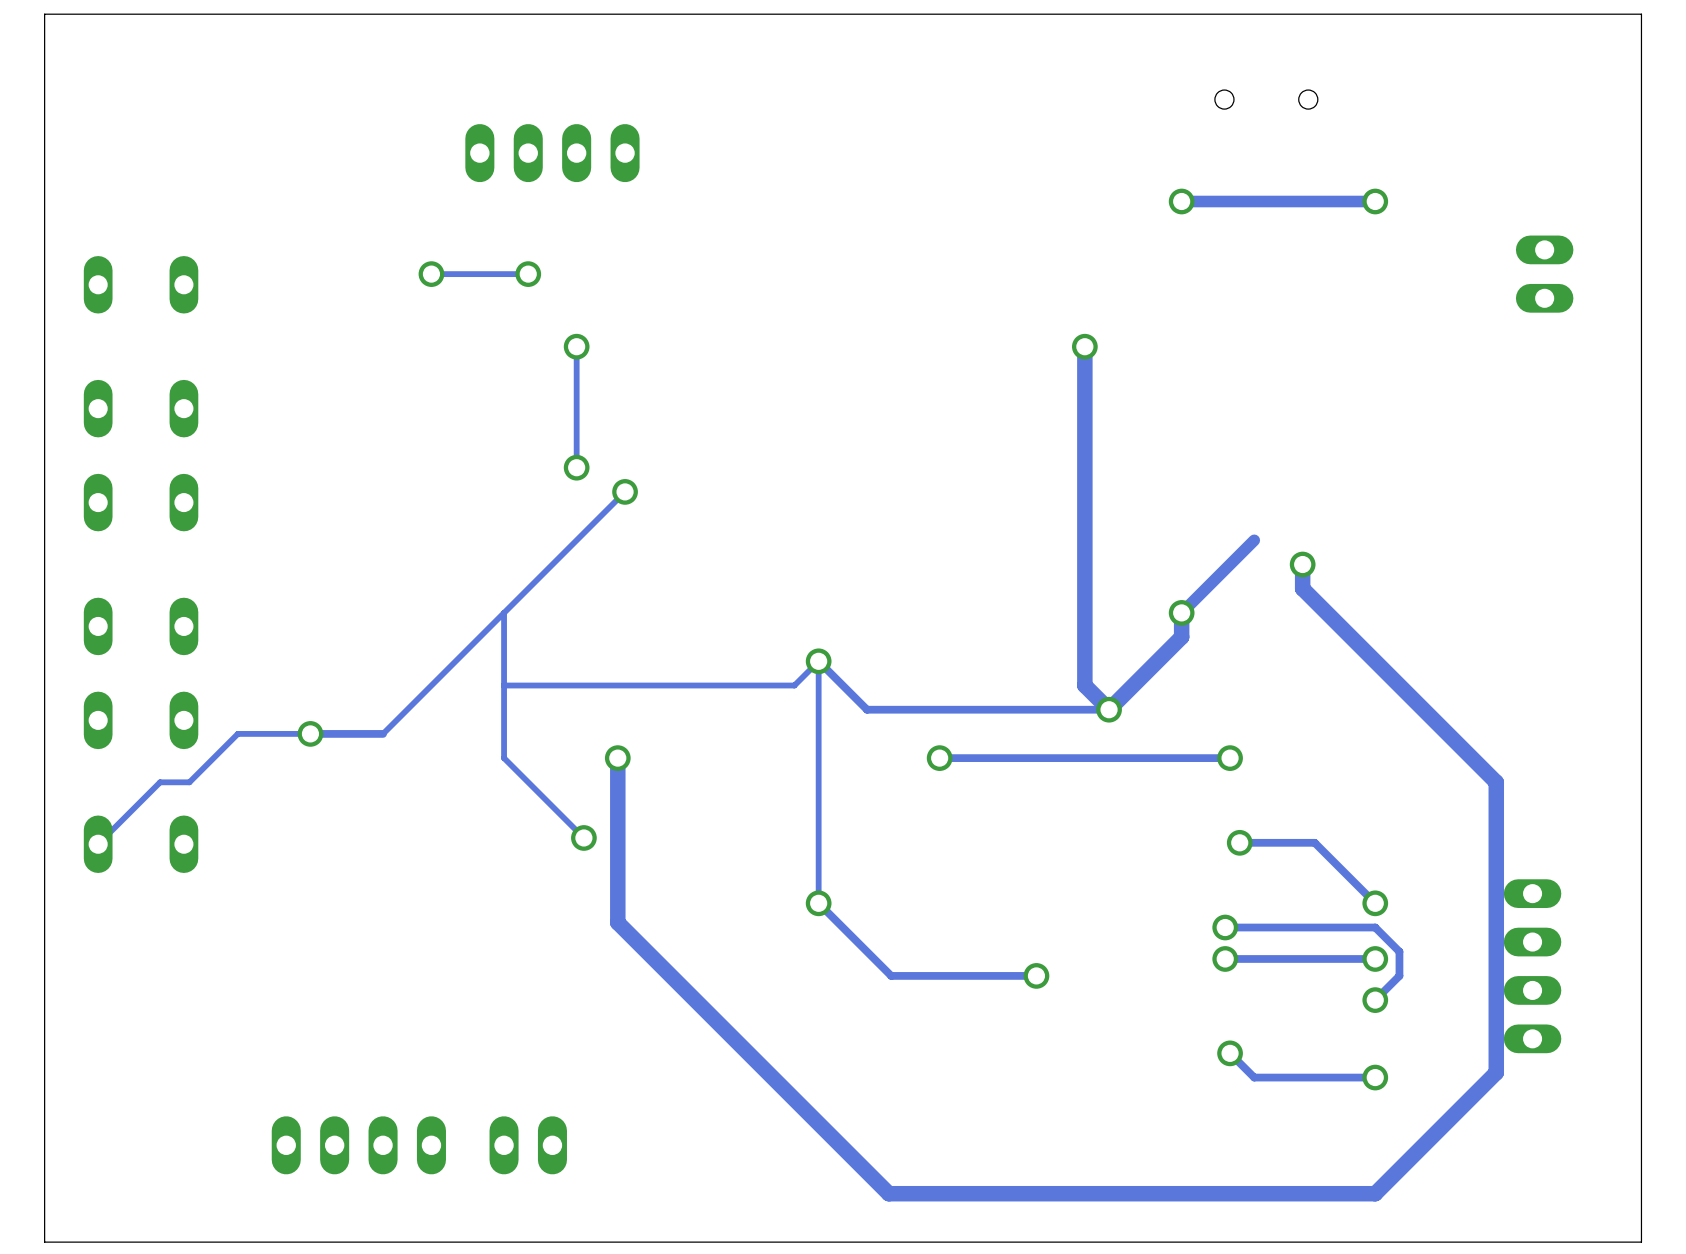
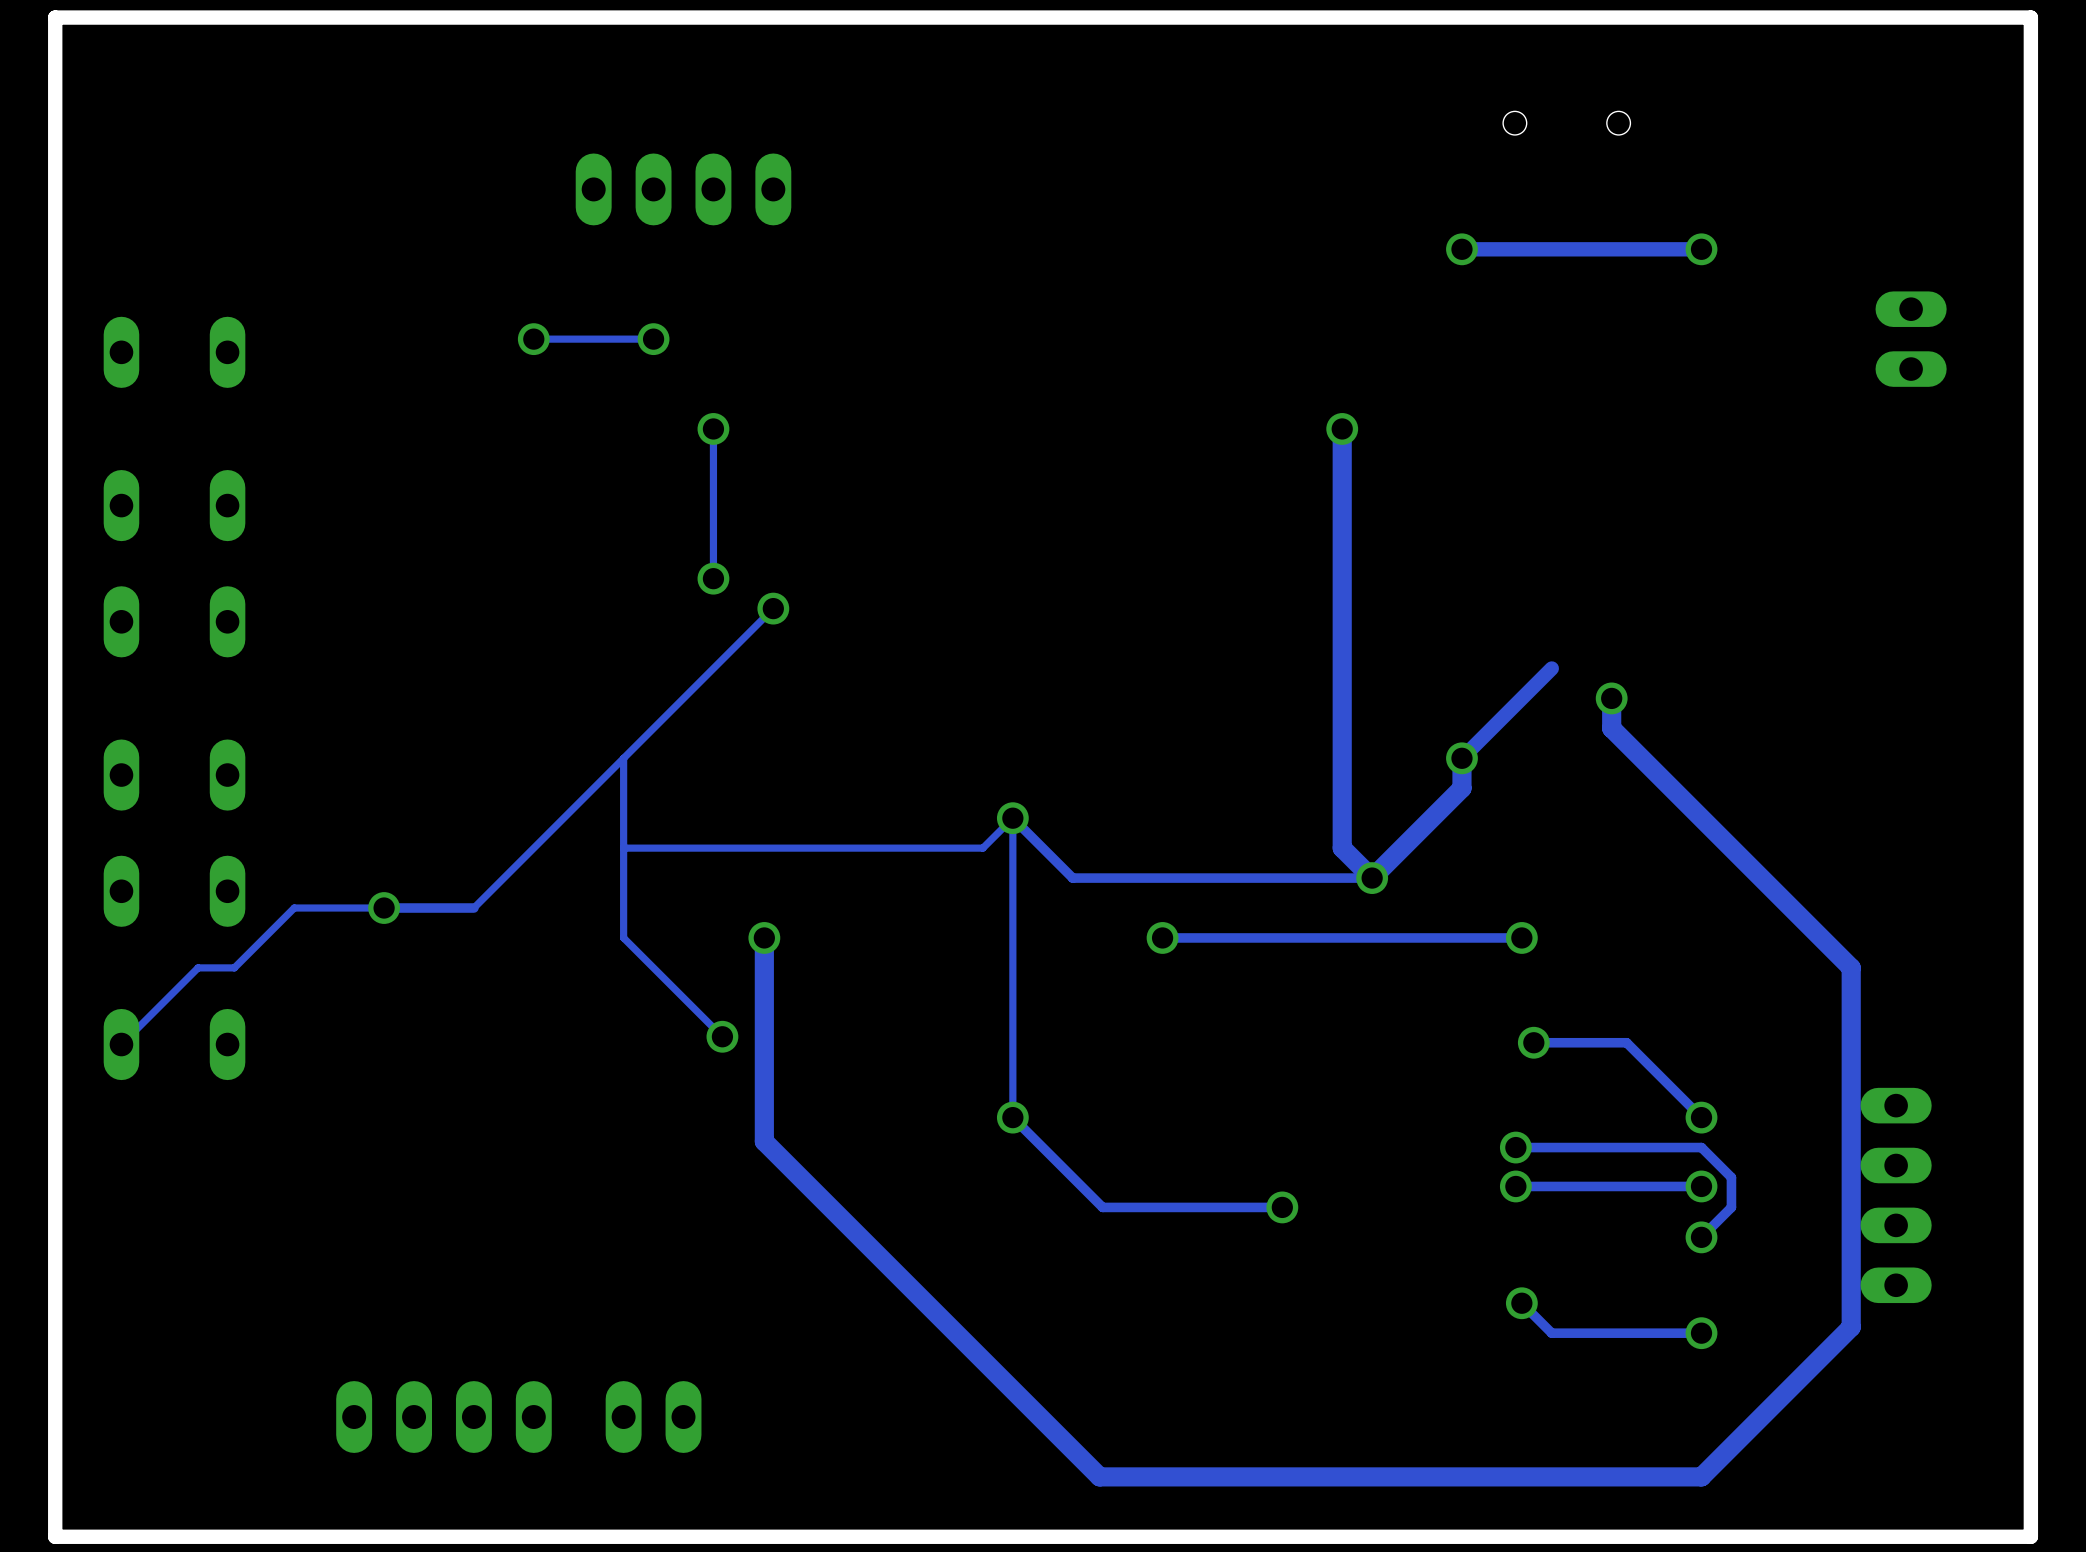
board edge width: thin (1641, 14) (44, 14) (44, 1242) (1641, 1242) (1641, 14) -> thick (2030, 17) (55, 17) (55, 1536) (2030, 1536) (2030, 17)

